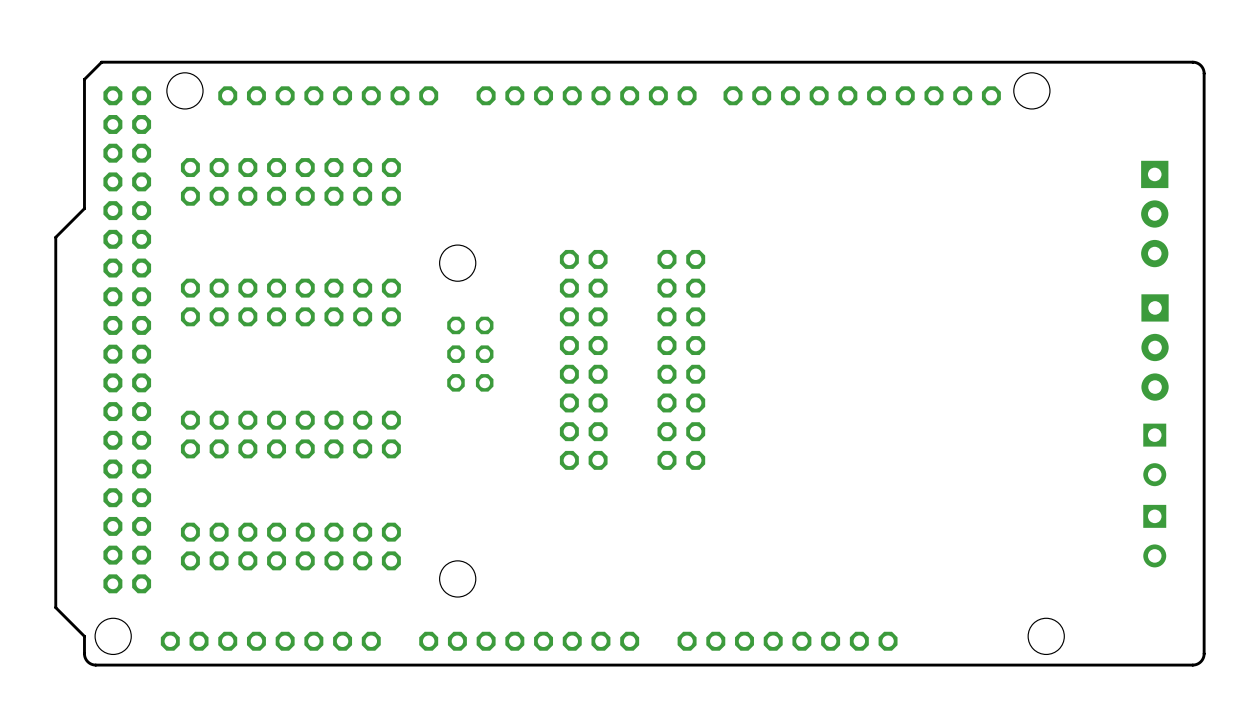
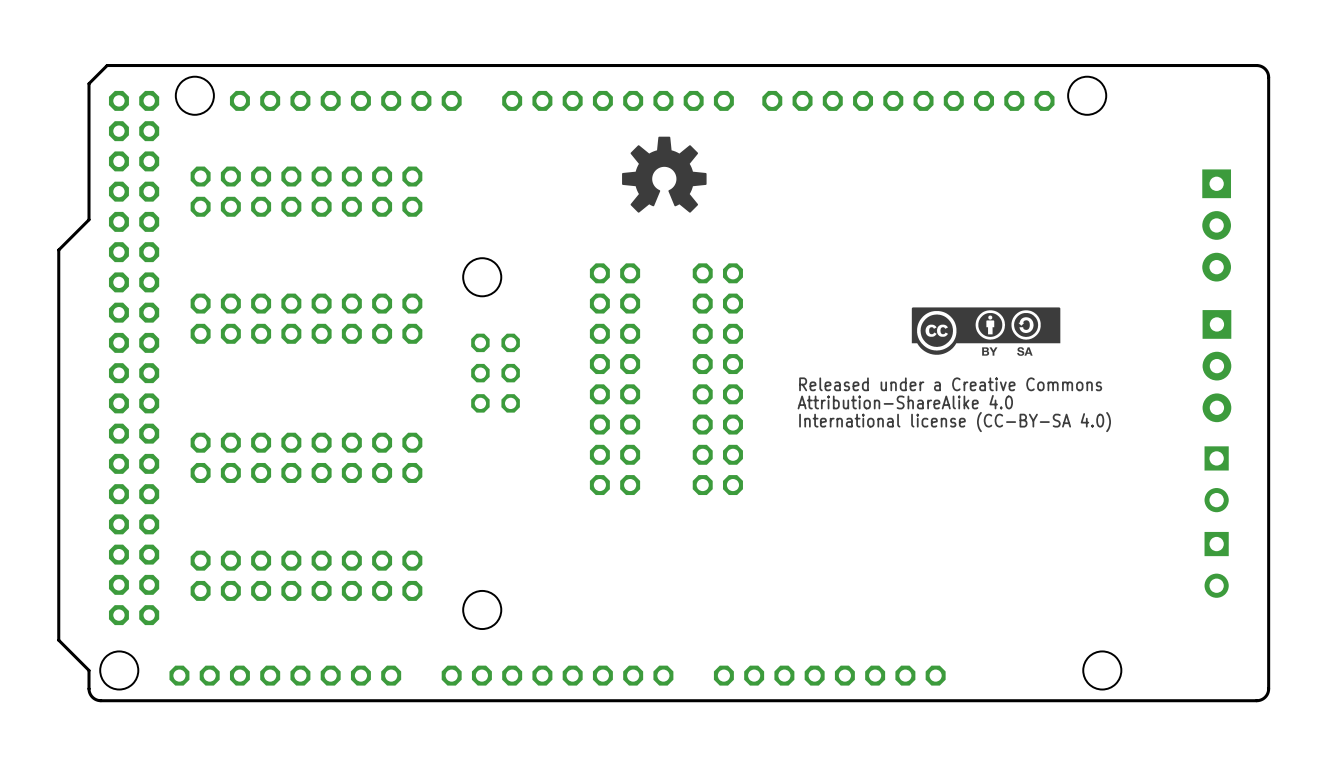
drawing: none -> [622, 136, 707, 213]
drawing: none -> [911, 307, 1061, 356]
text: none -> Released under a Creative Commons (950, 384)
text: none -> Attribution-ShareAlike 4.0 (905, 402)
text: none -> International license (CC-BY-SA 4.0) (955, 422)

